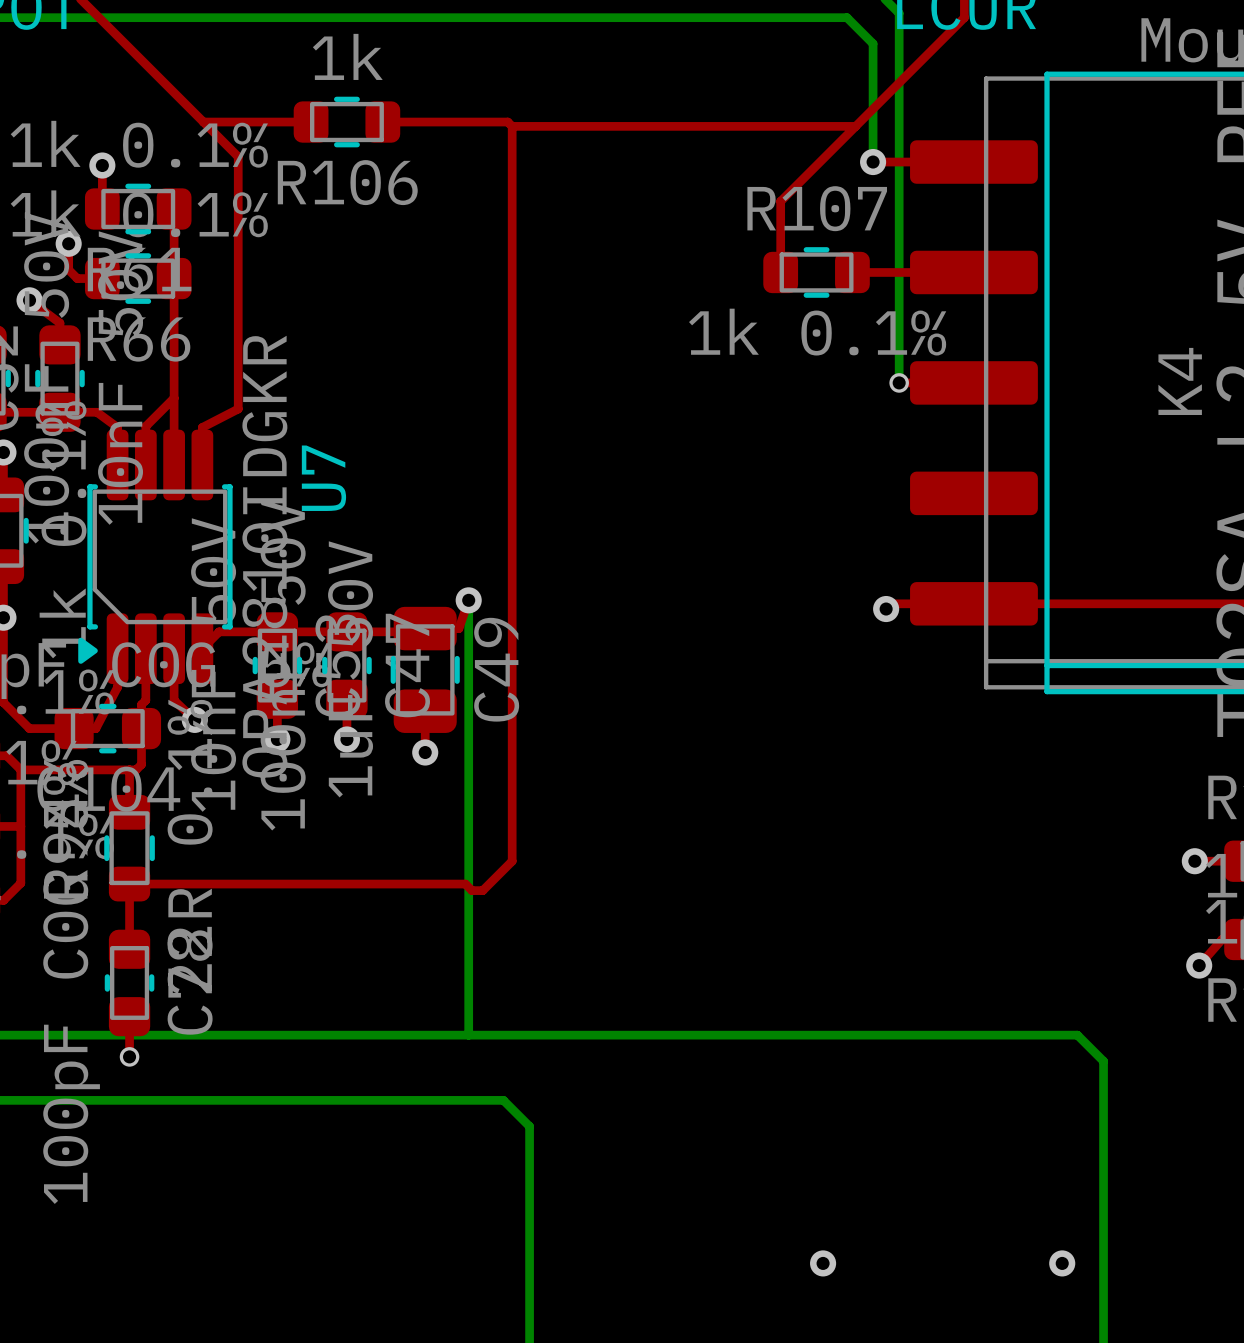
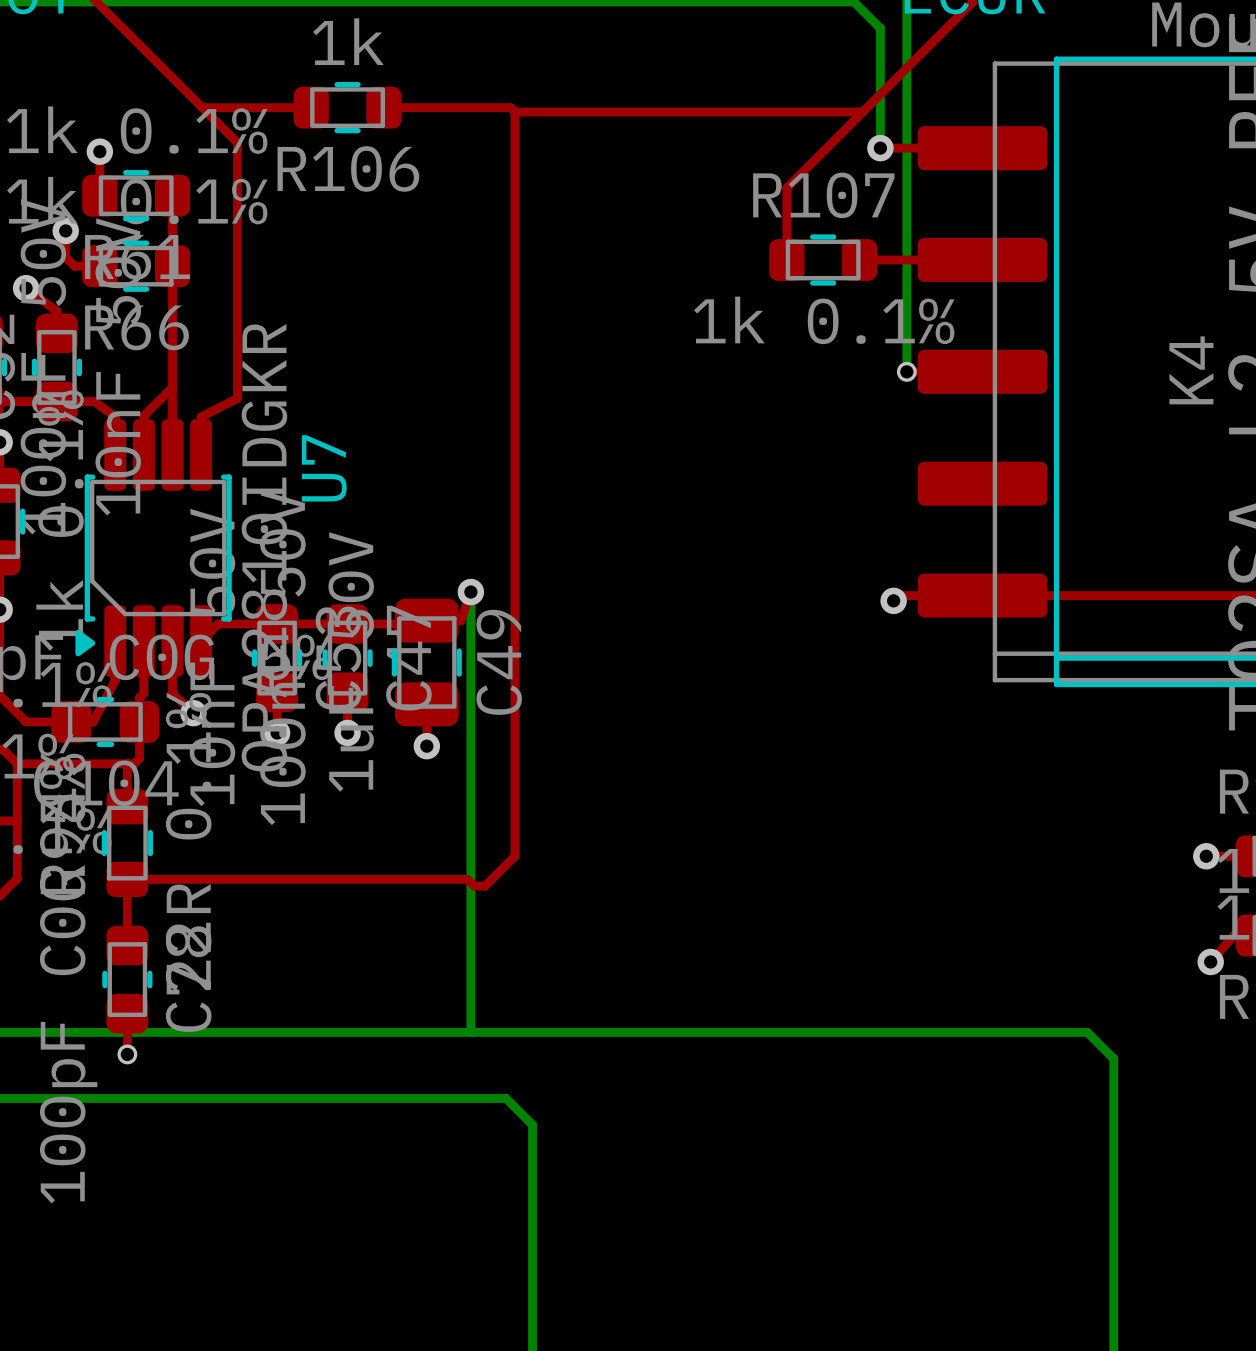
via: (823, 1263) -> none
via: (1062, 1263) -> none

